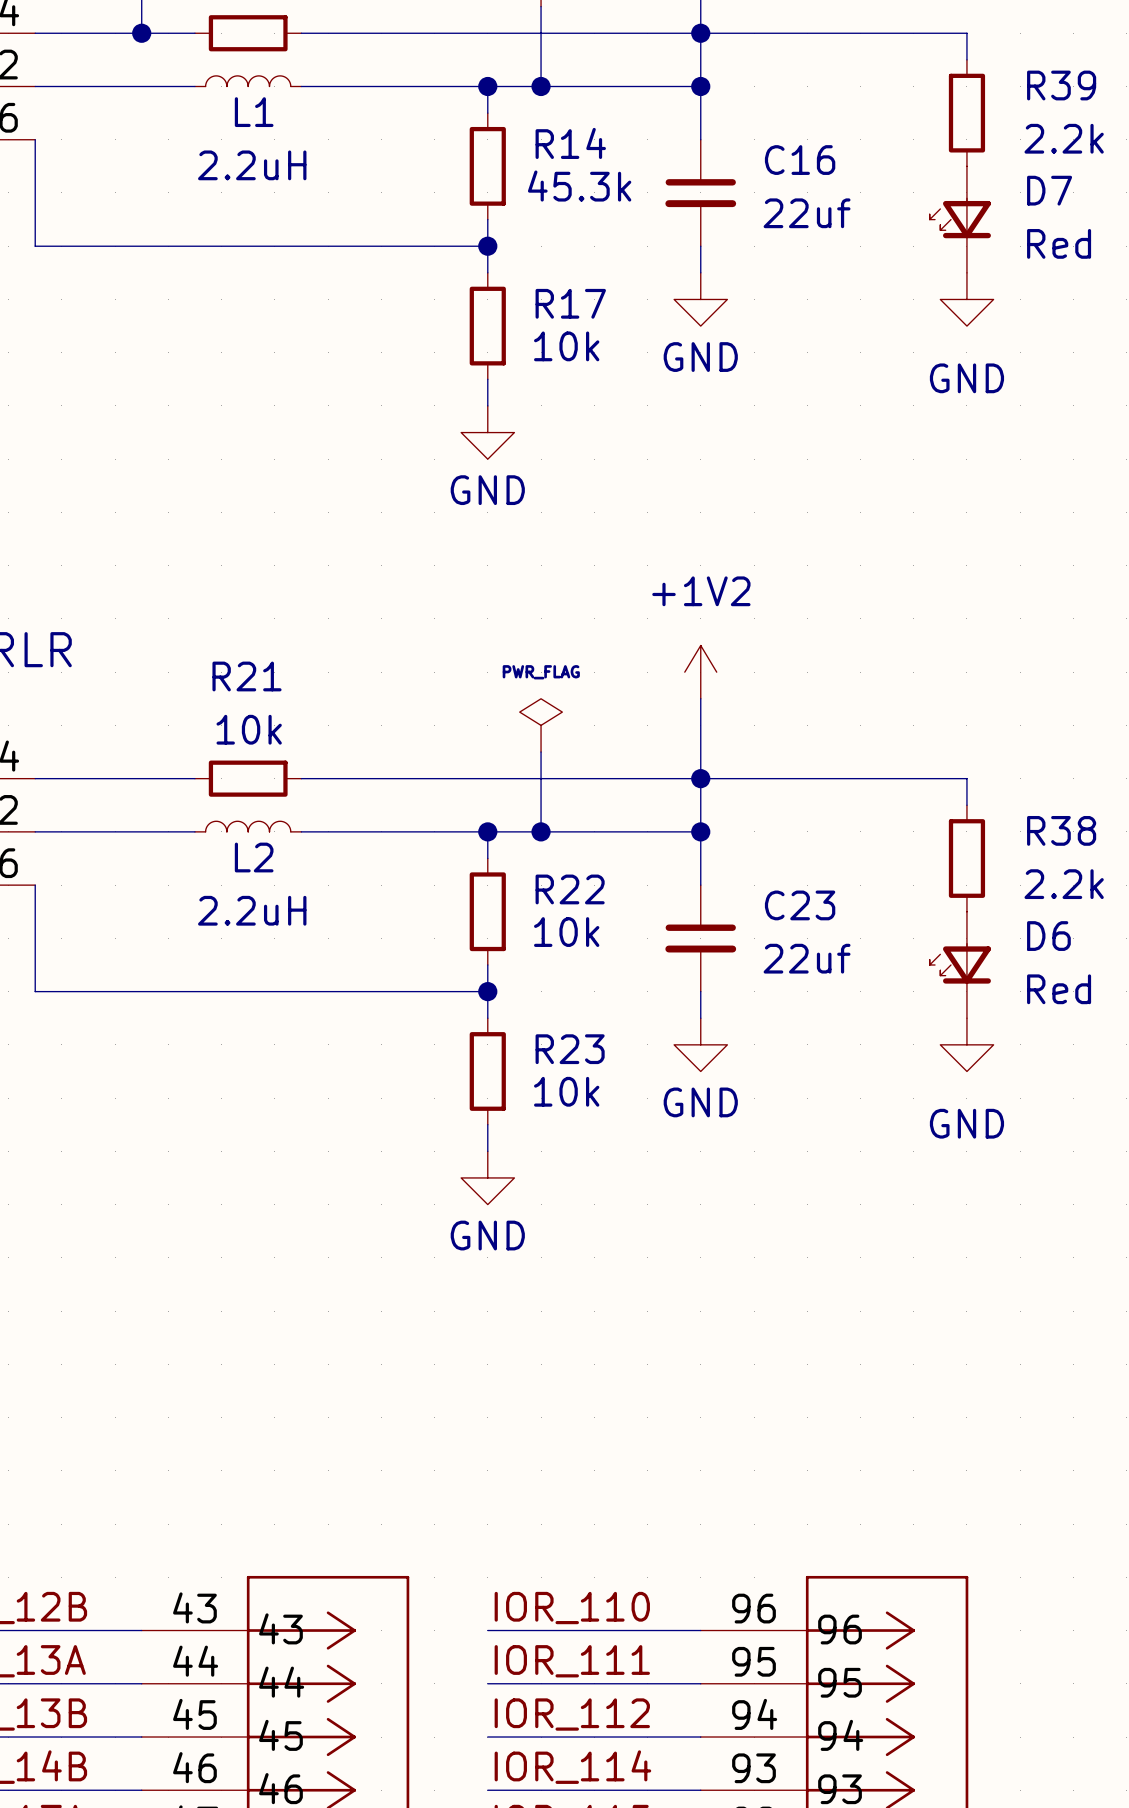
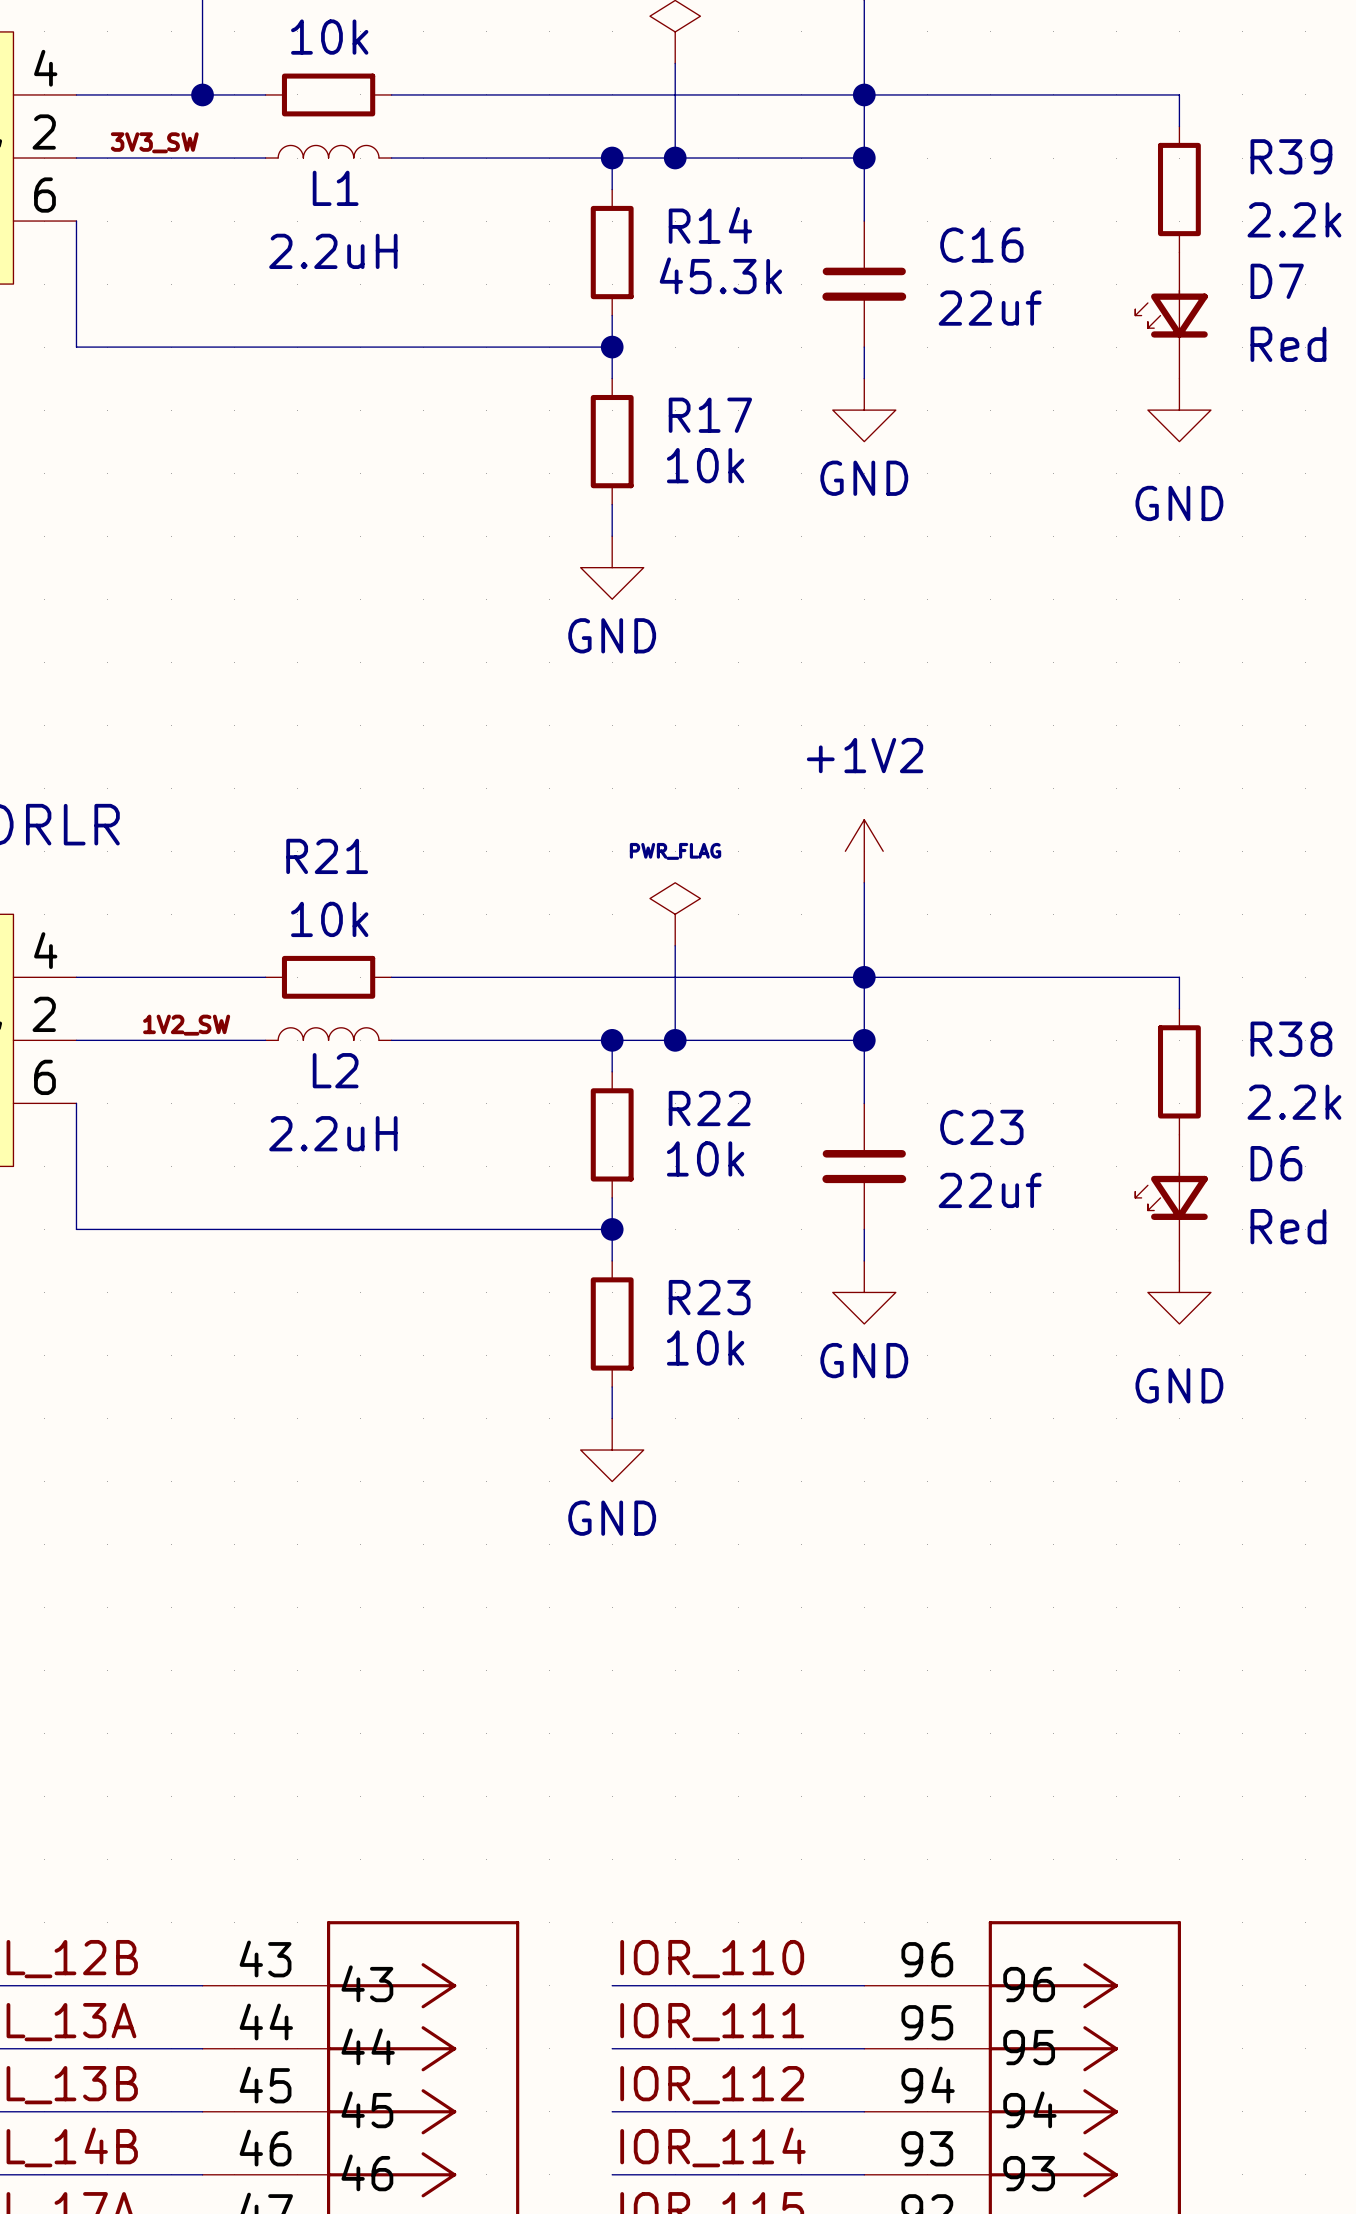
label: none -> 3V3_SW (154, 142)
label: none -> 1V2_SW (186, 1025)

